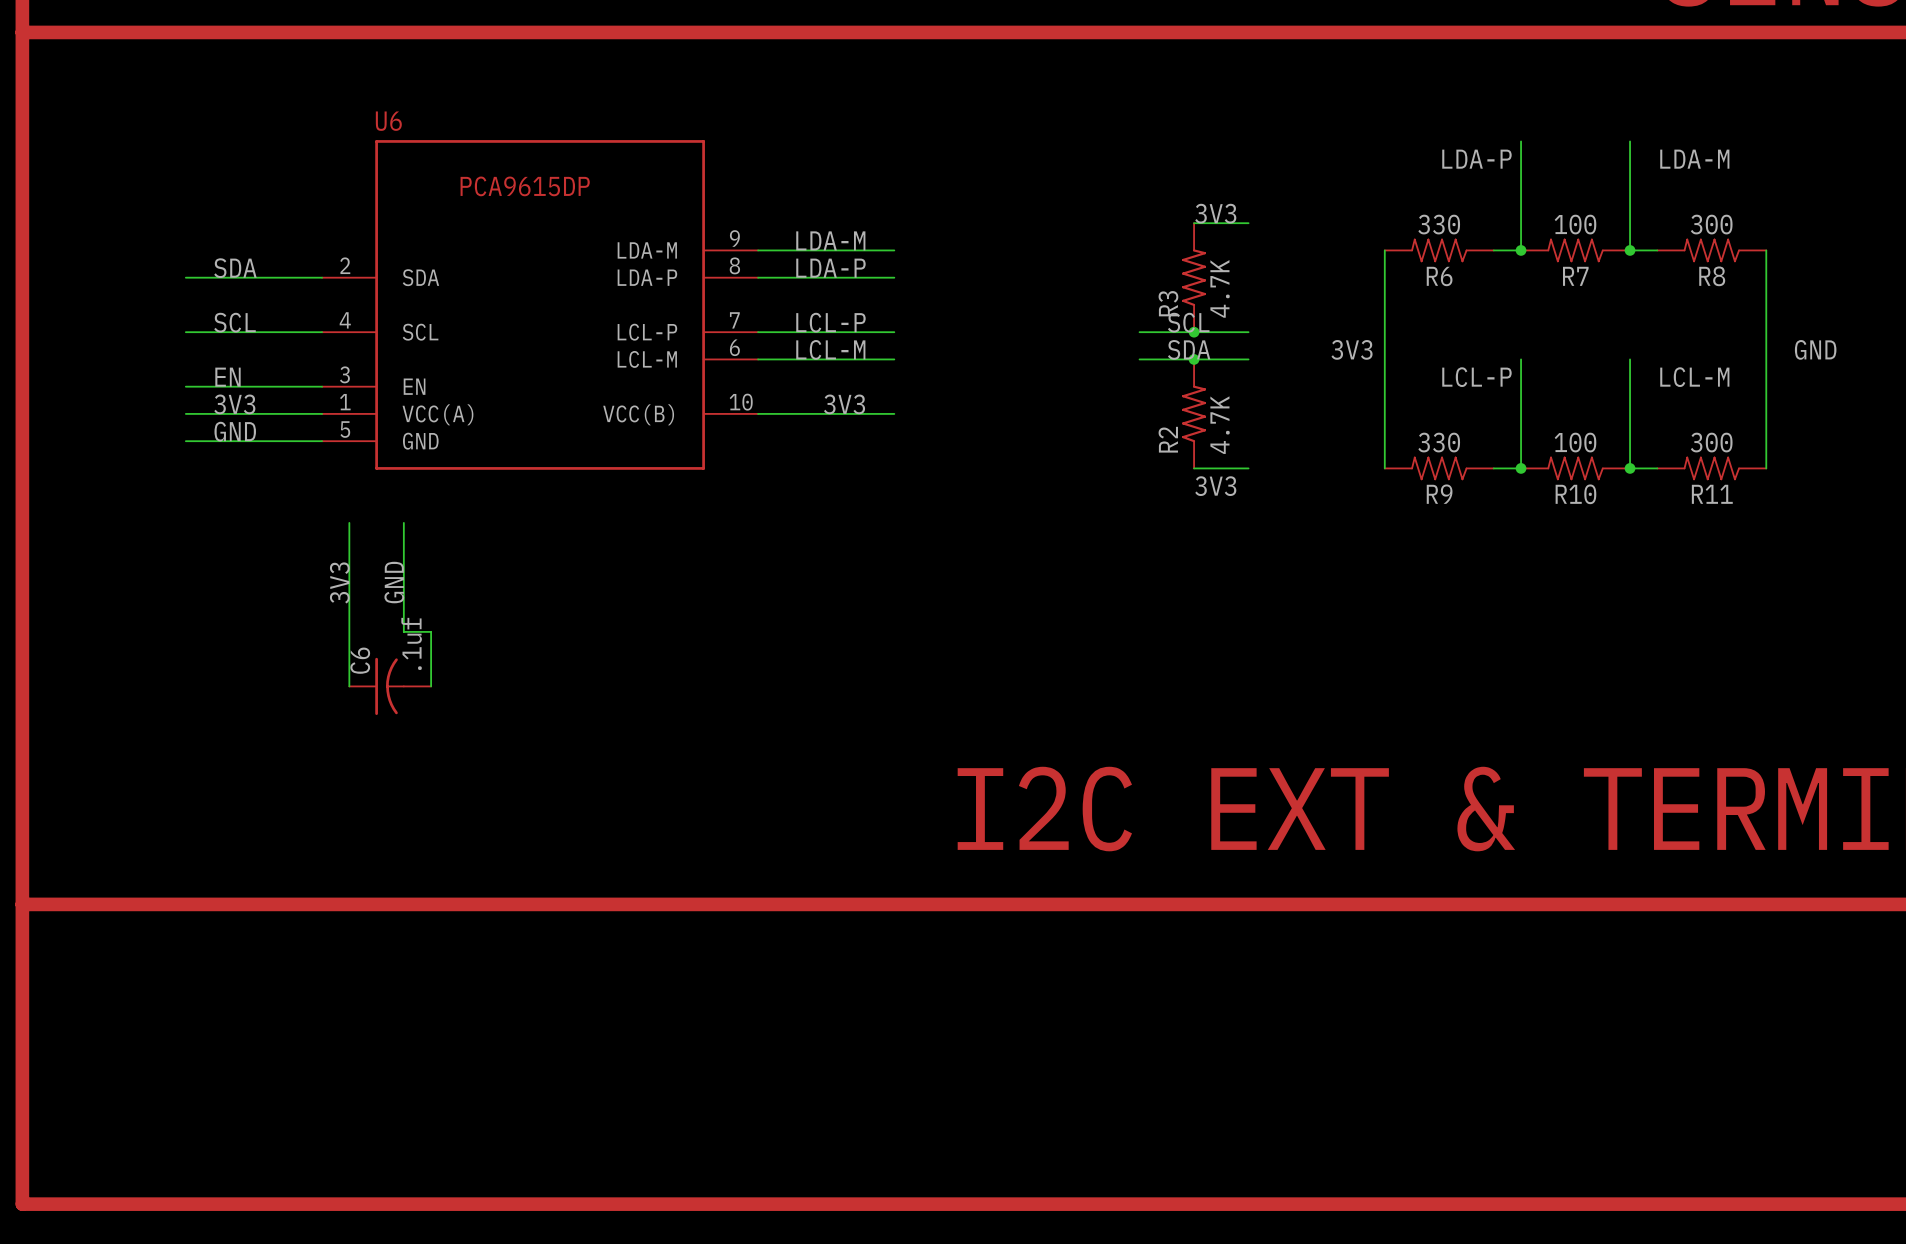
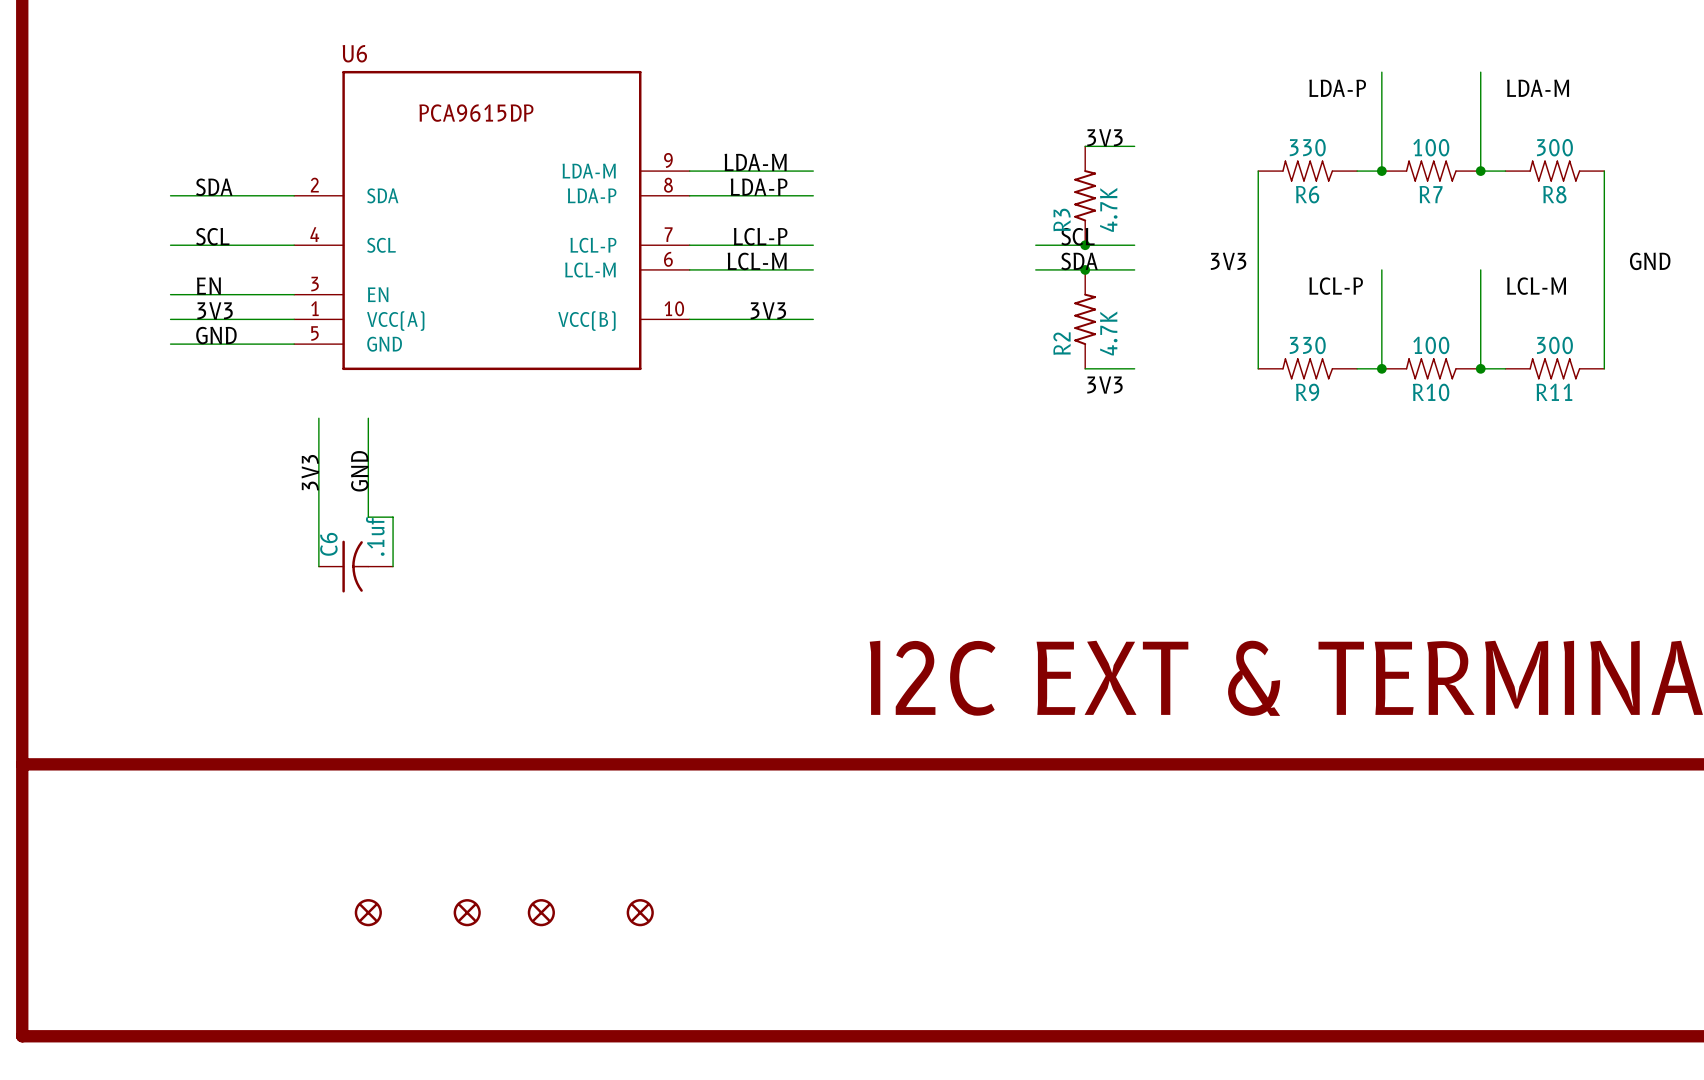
part: none -> (368, 912)
part: none -> (467, 912)
part: none -> (541, 912)
part: none -> (640, 912)

